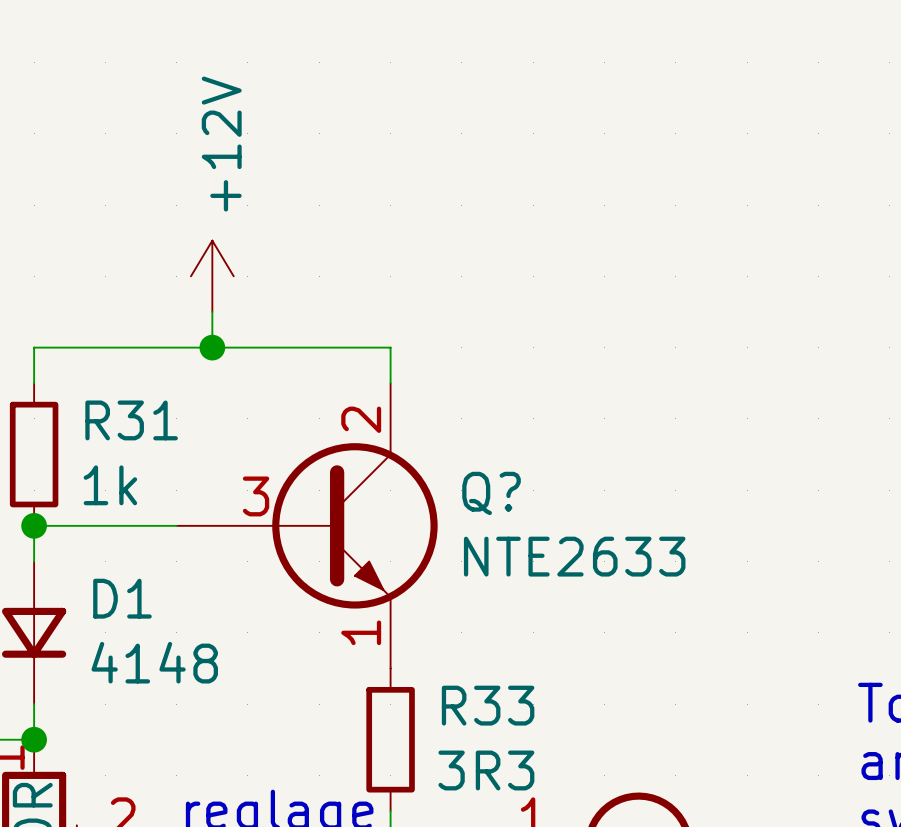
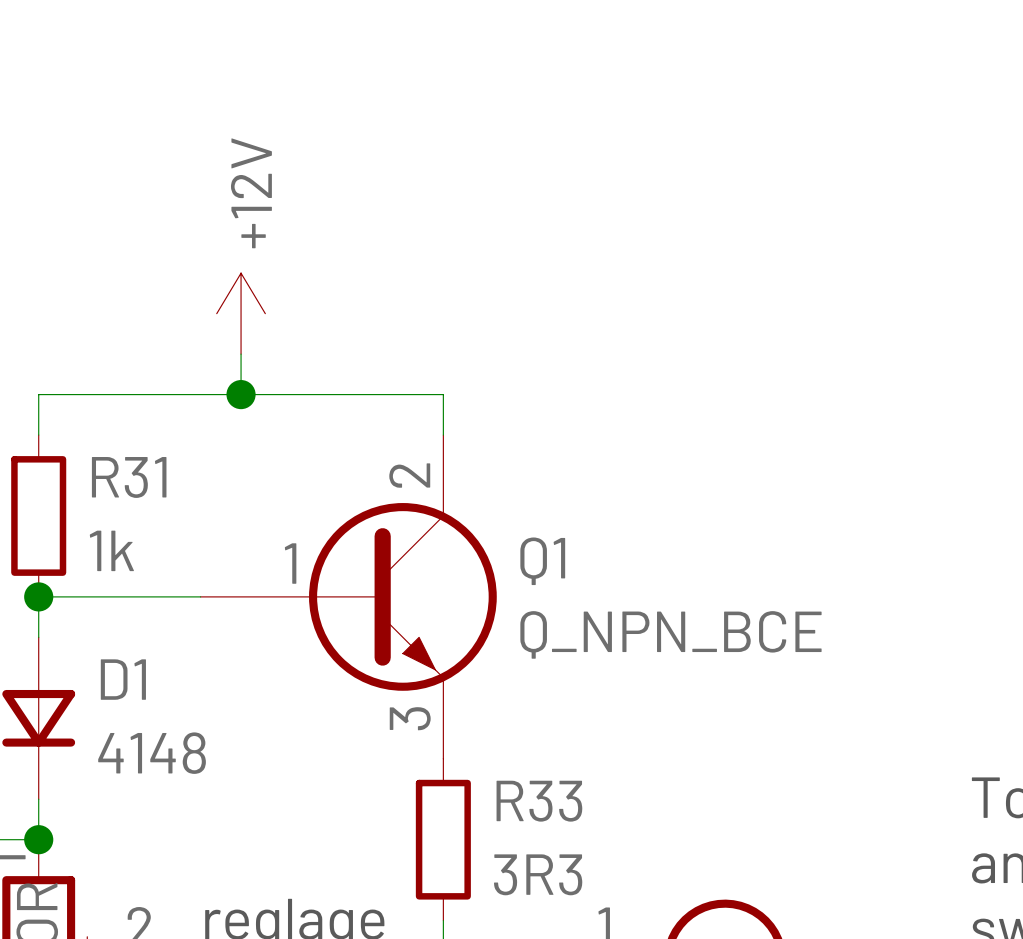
Q? name: Q? (491, 493) -> Q1 (542, 561)
Q? pin number: 3 (256, 496) -> 1 (290, 563)
Q? value: NTE2633 (574, 556) -> Q_NPN_BCE (670, 634)
Q? pin number: 1 (361, 632) -> 3 (410, 718)

